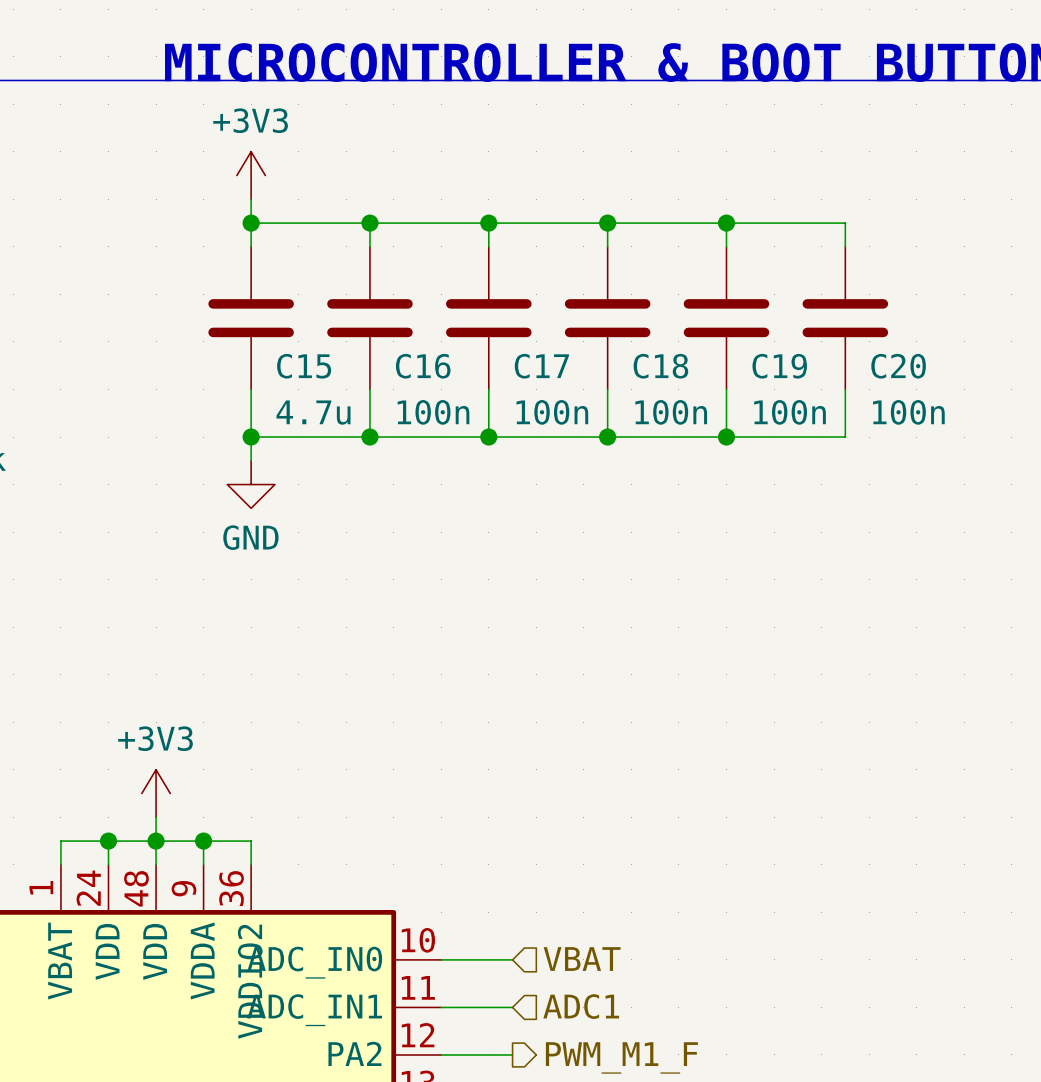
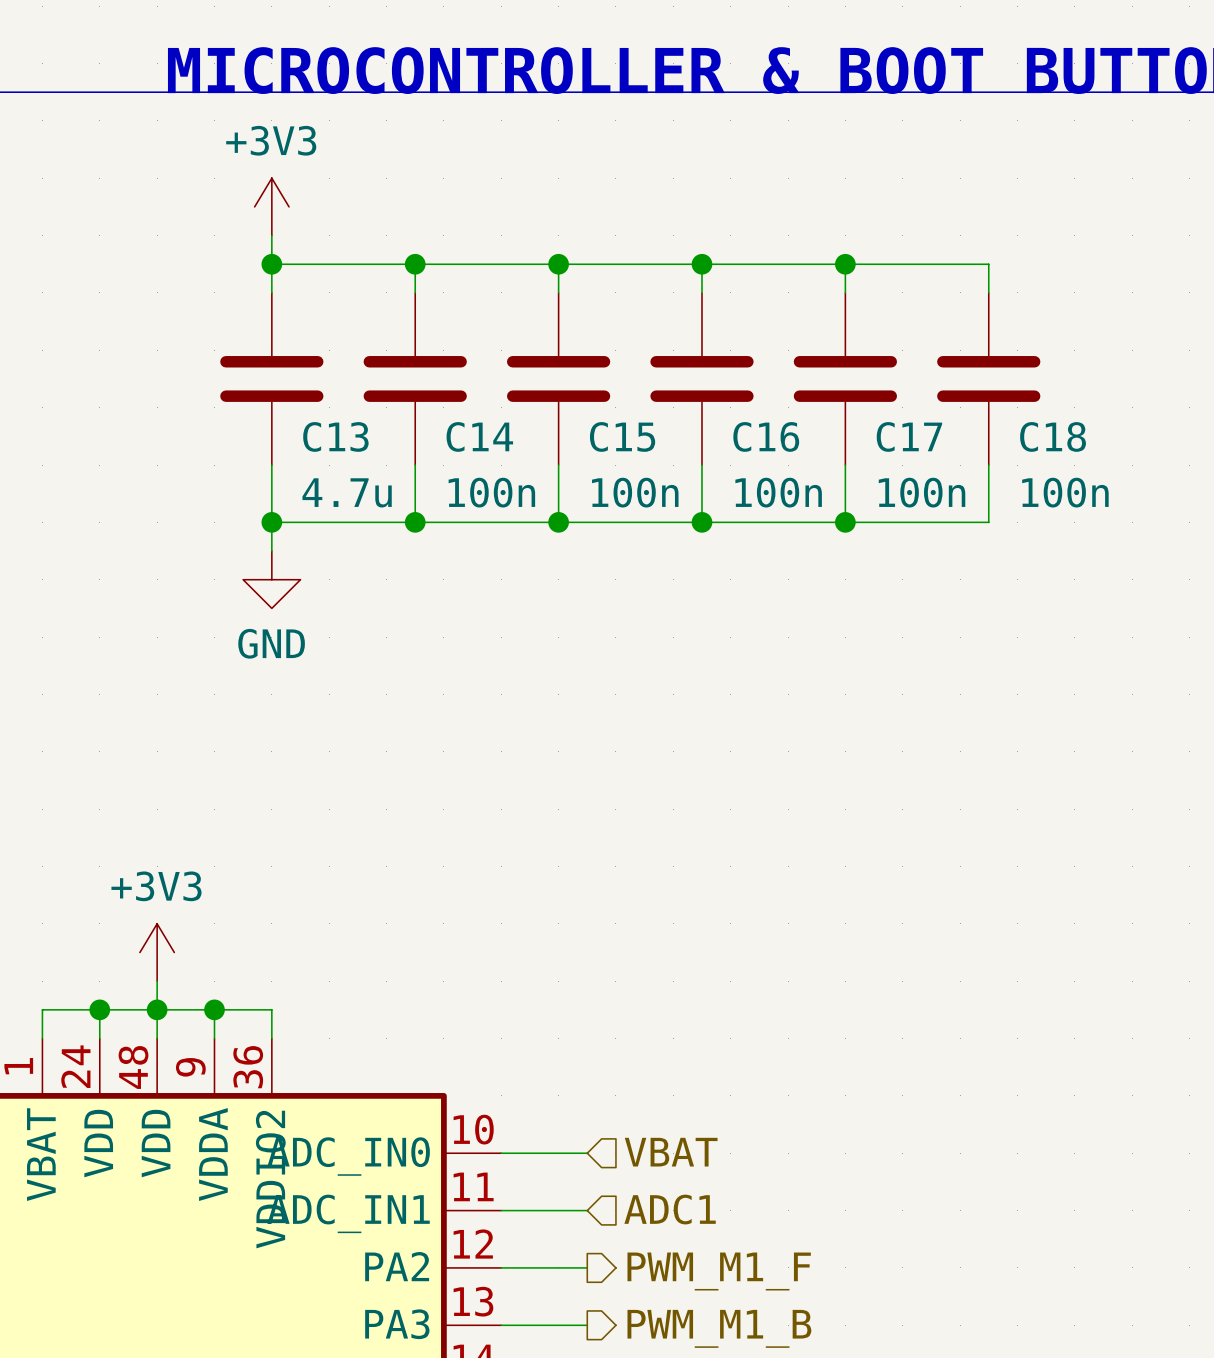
C15 name: C15 (304, 366) -> C13 (335, 436)
C16 name: C16 (423, 366) -> C14 (479, 436)
C17 name: C17 (541, 366) -> C15 (622, 436)
C18 name: C18 (660, 366) -> C16 (766, 436)
C19 name: C19 (779, 366) -> C17 (909, 436)
C20 name: C20 (898, 366) -> C18 (1053, 436)

